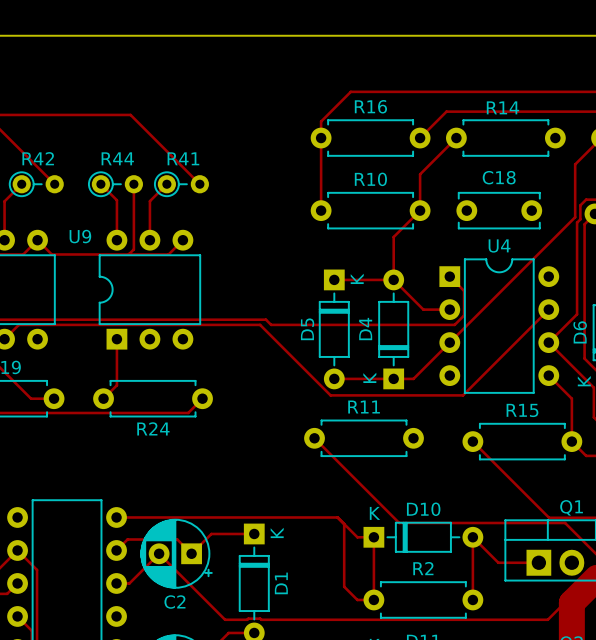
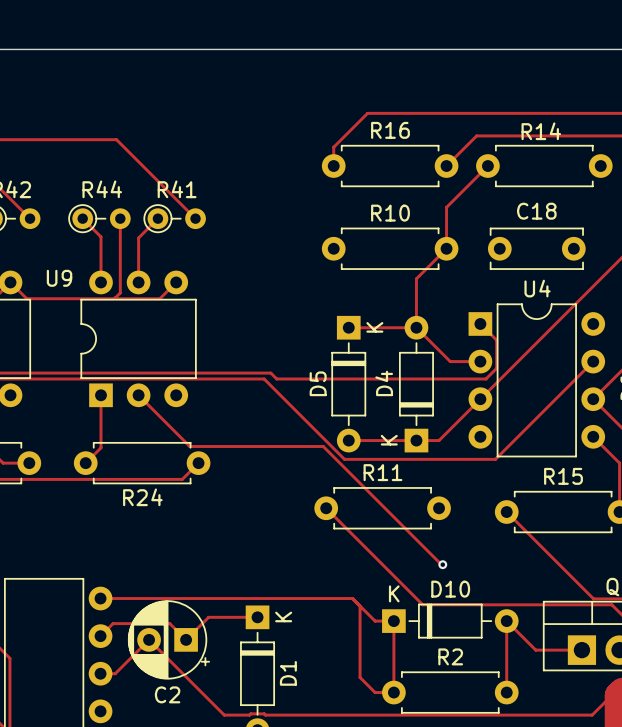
top track: (321, 138) (321, 210) -> none
top track: none -> (138, 395) (189, 446) (323, 446) (442, 564)
via: none -> (442, 564)

